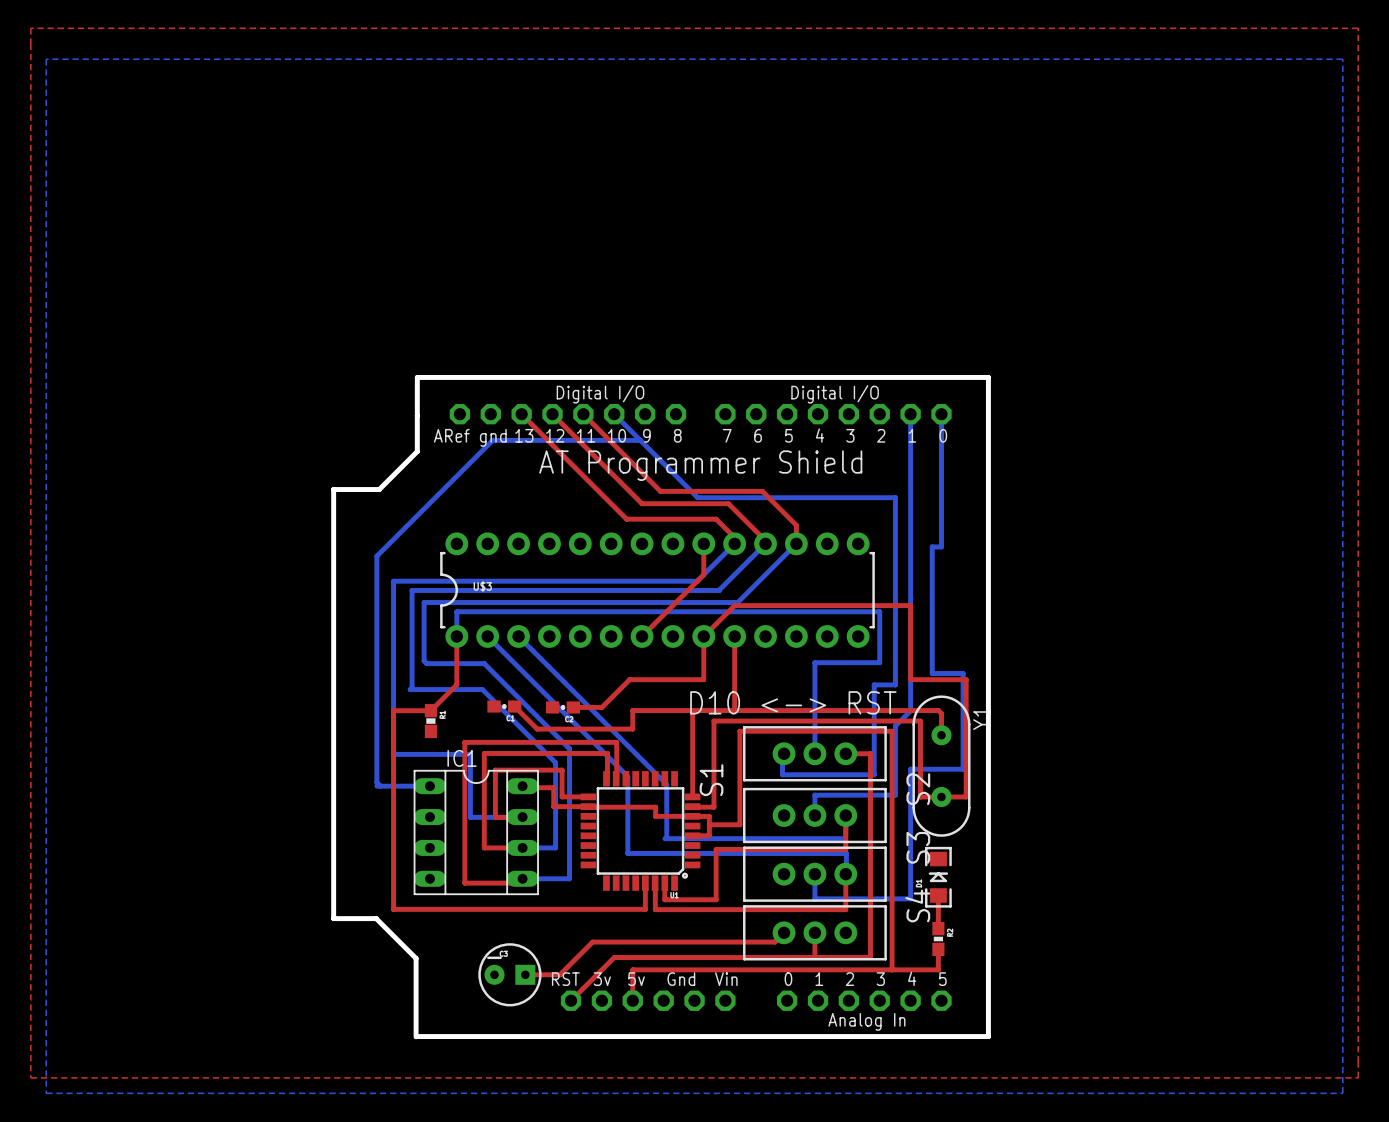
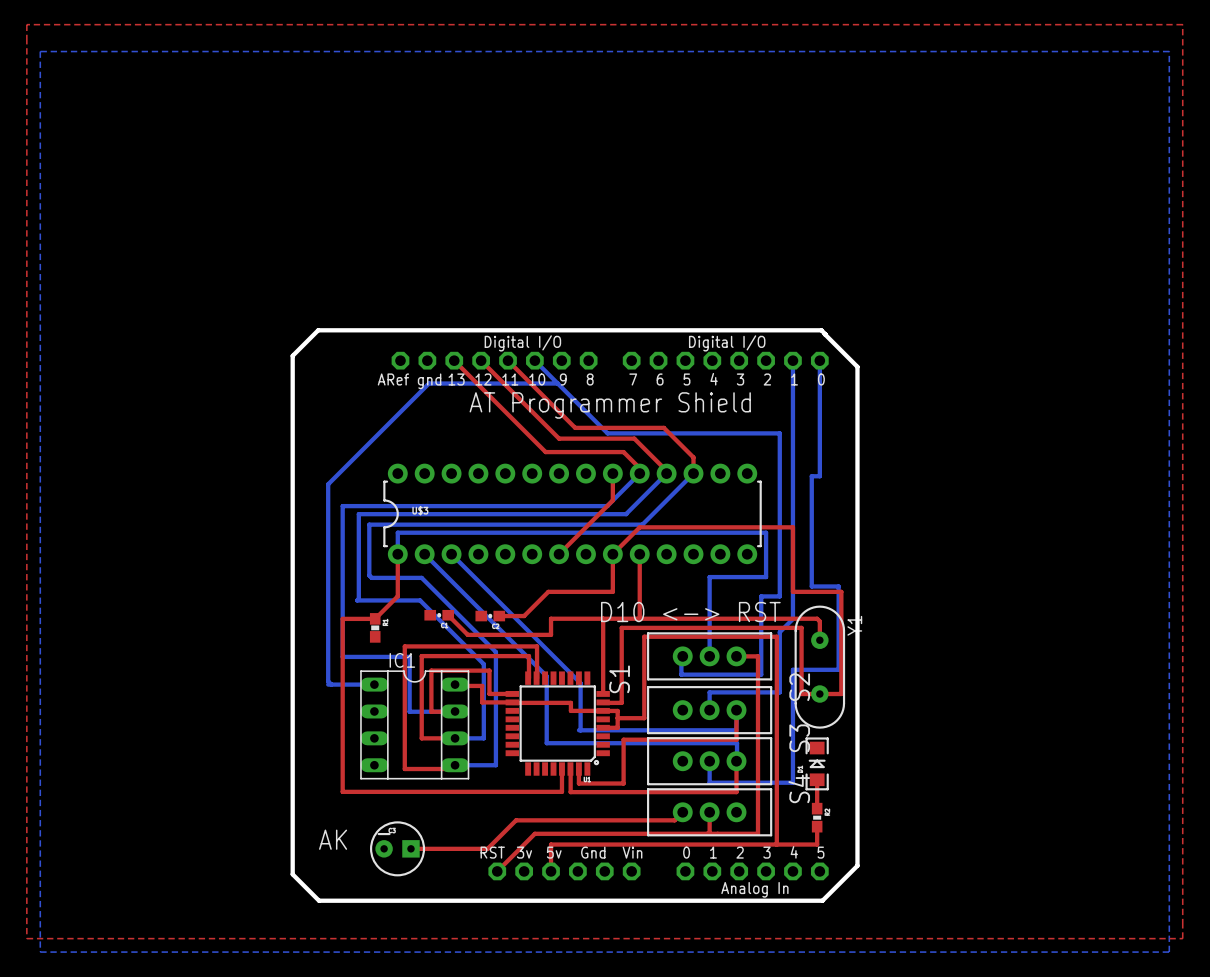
board edge: (418, 377) (417, 451) (379, 489) (333, 489) (333, 918) (376, 918) (416, 958) (416, 1036) -> none
board edge: (418, 377) (988, 377) (988, 1036) (417, 1036) -> none
board edge: none -> (824, 333) (857, 366) (857, 865) (822, 900) (319, 900) (292, 874) (292, 355) (318, 330) (821, 330) (825, 334) (825, 334)
text: none -> AK (333, 839)
top track: none -> (410, 848) (457, 848)
part position: (509, 974) -> (397, 848)

